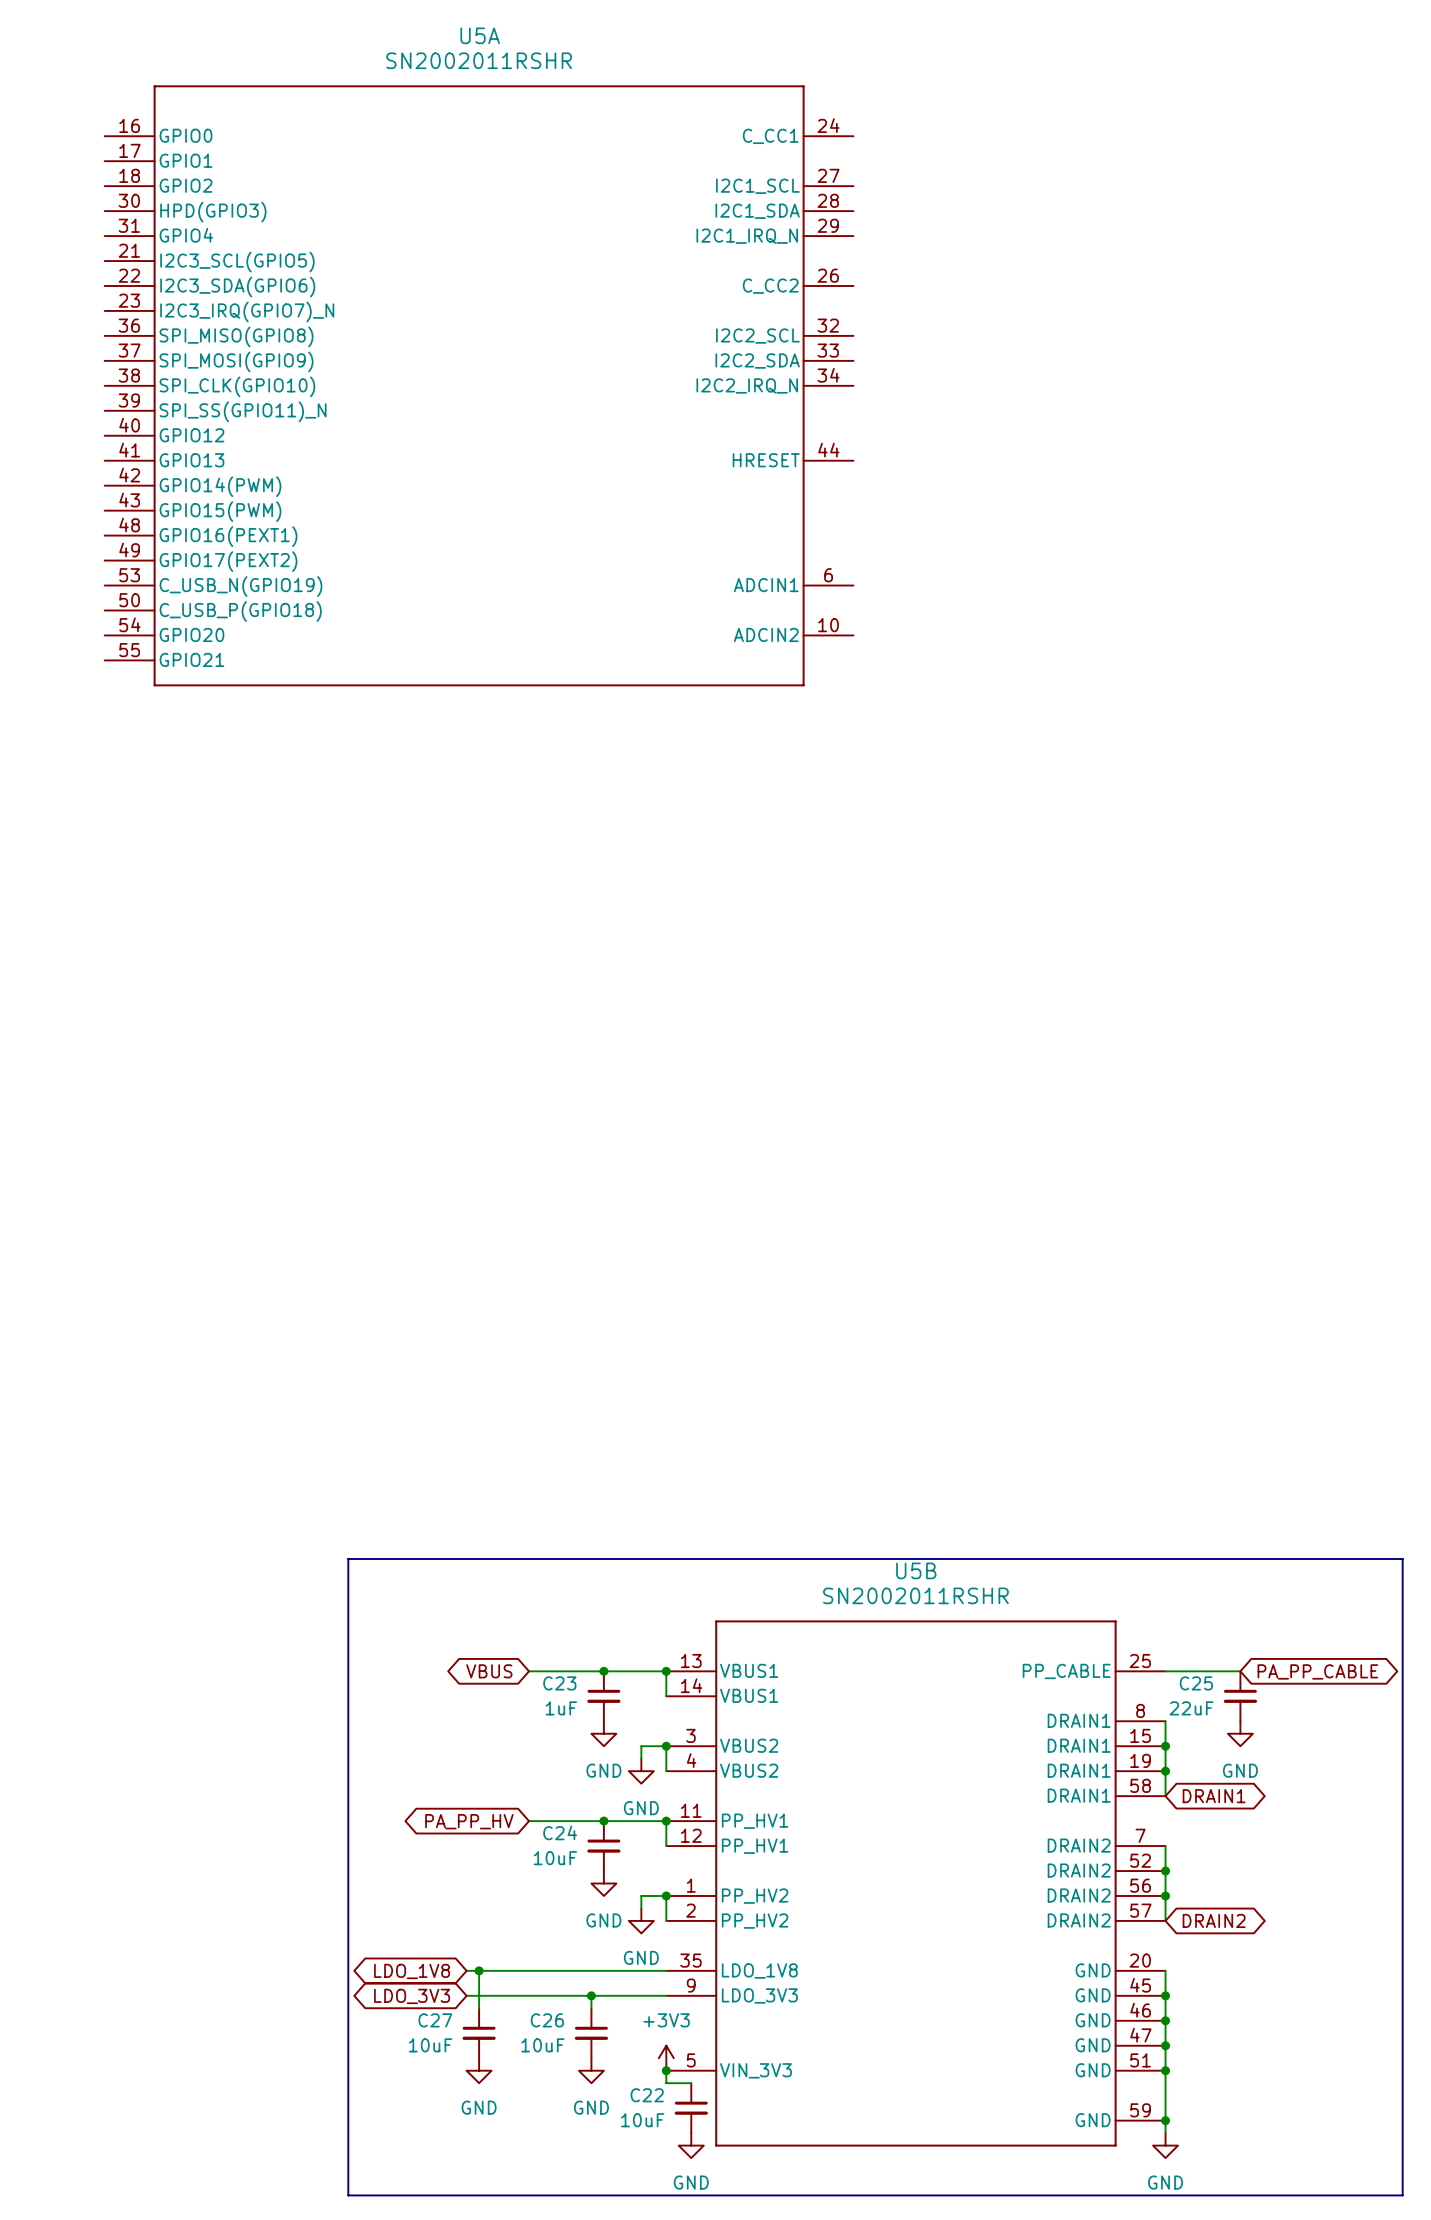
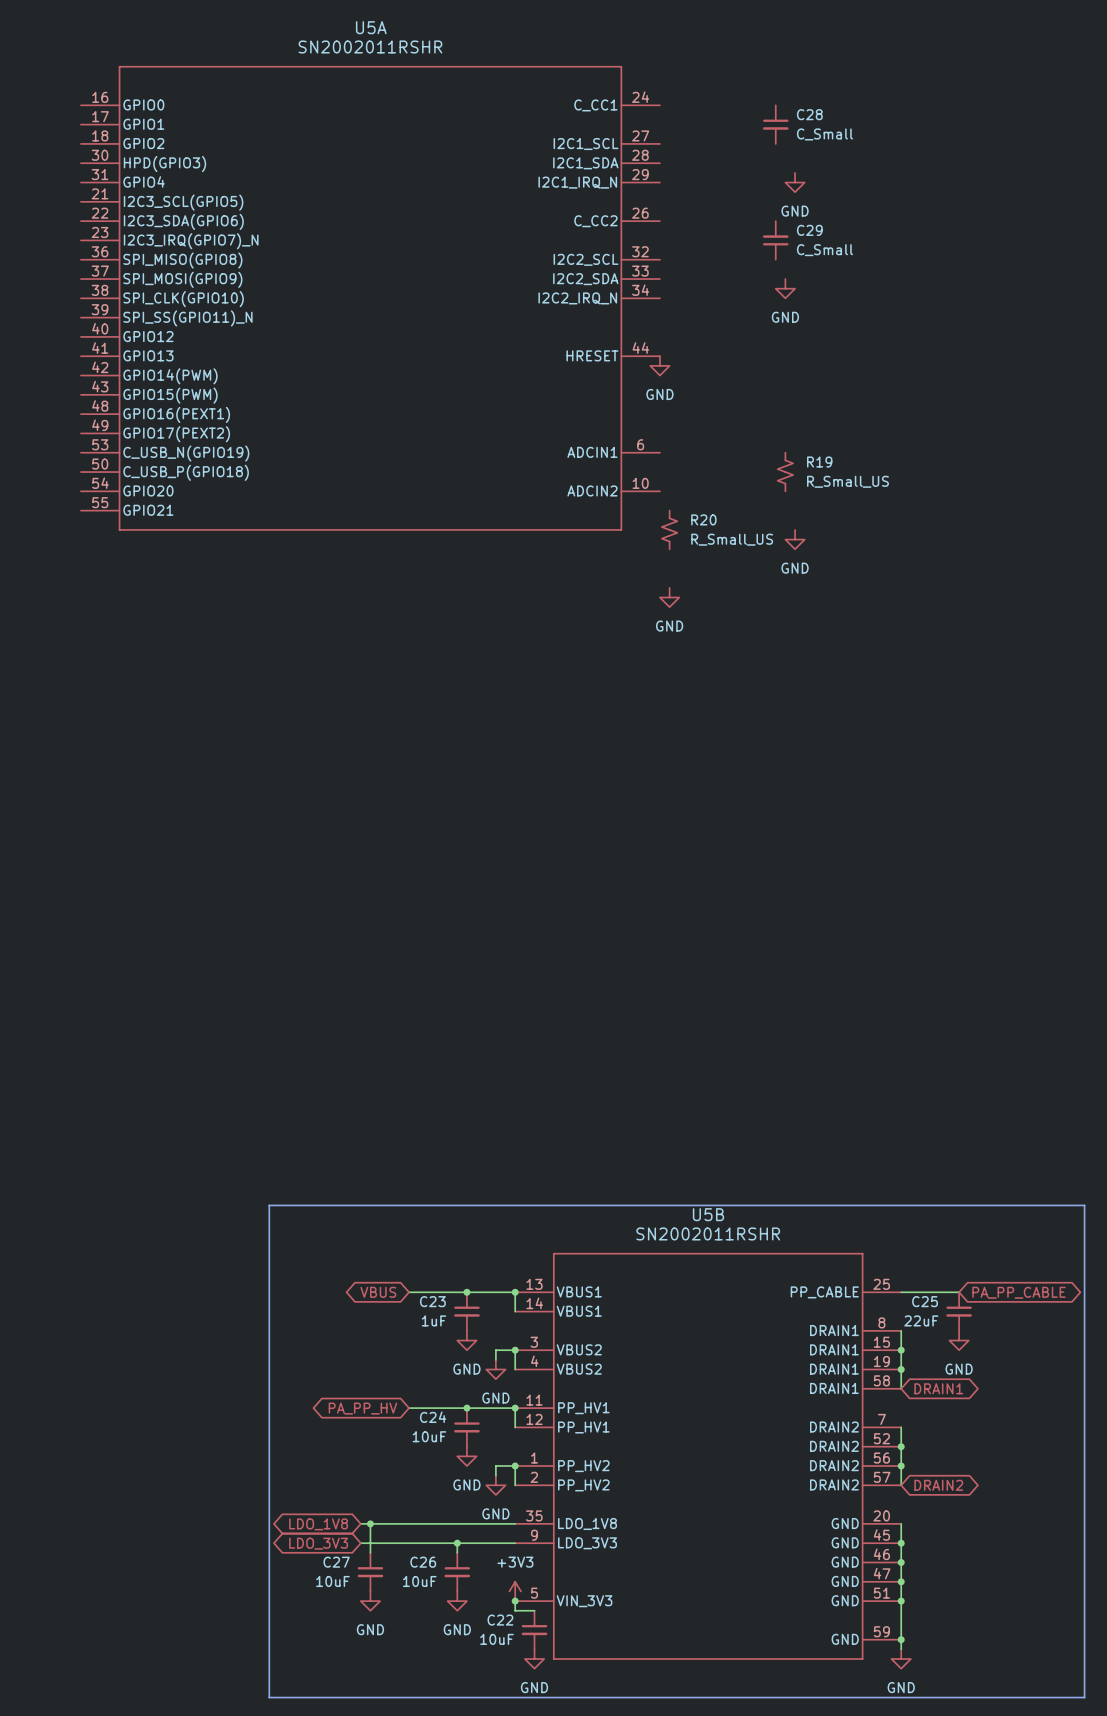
C28: none -> C_Small (775, 124)
power symbol: none -> GND (795, 182)
C29: none -> C_Small (775, 240)
power symbol: none -> GND (785, 288)
power symbol: none -> GND (659, 365)
R19: none -> R_Small_US (785, 472)
R20: none -> R_Small_US (669, 529)
power symbol: none -> GND (795, 539)
power symbol: none -> GND (669, 597)

